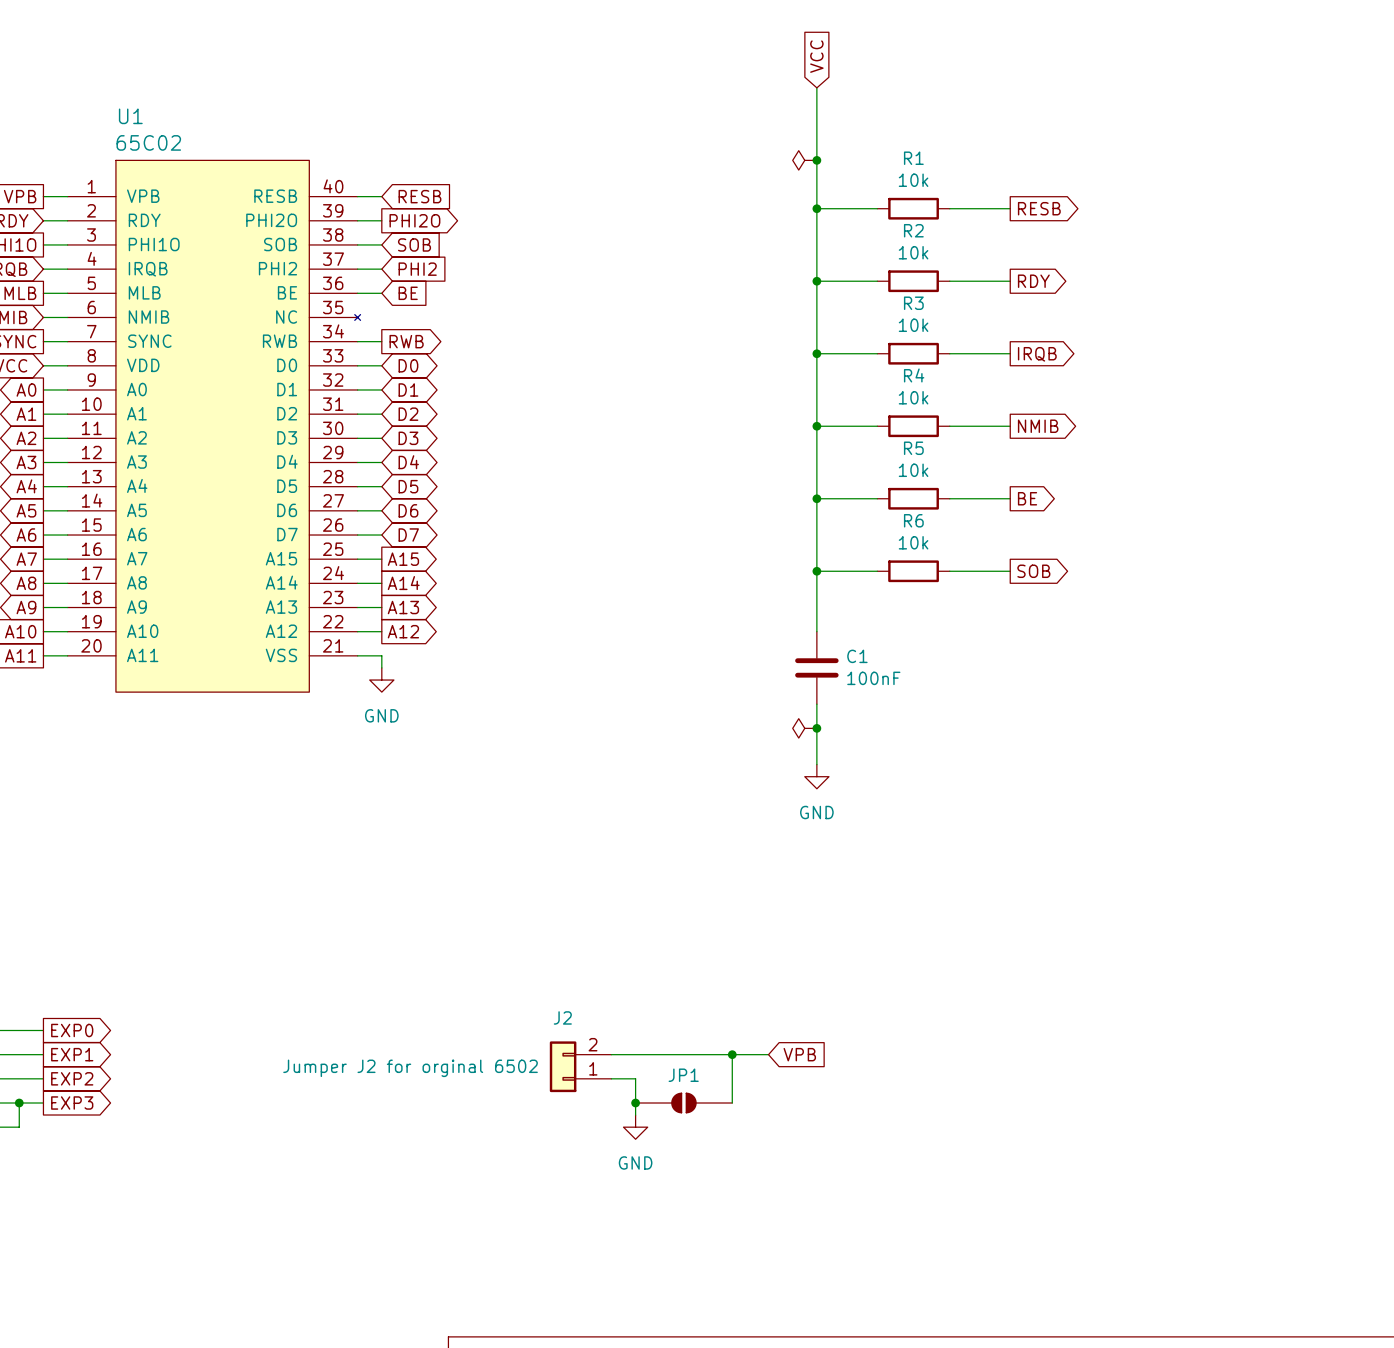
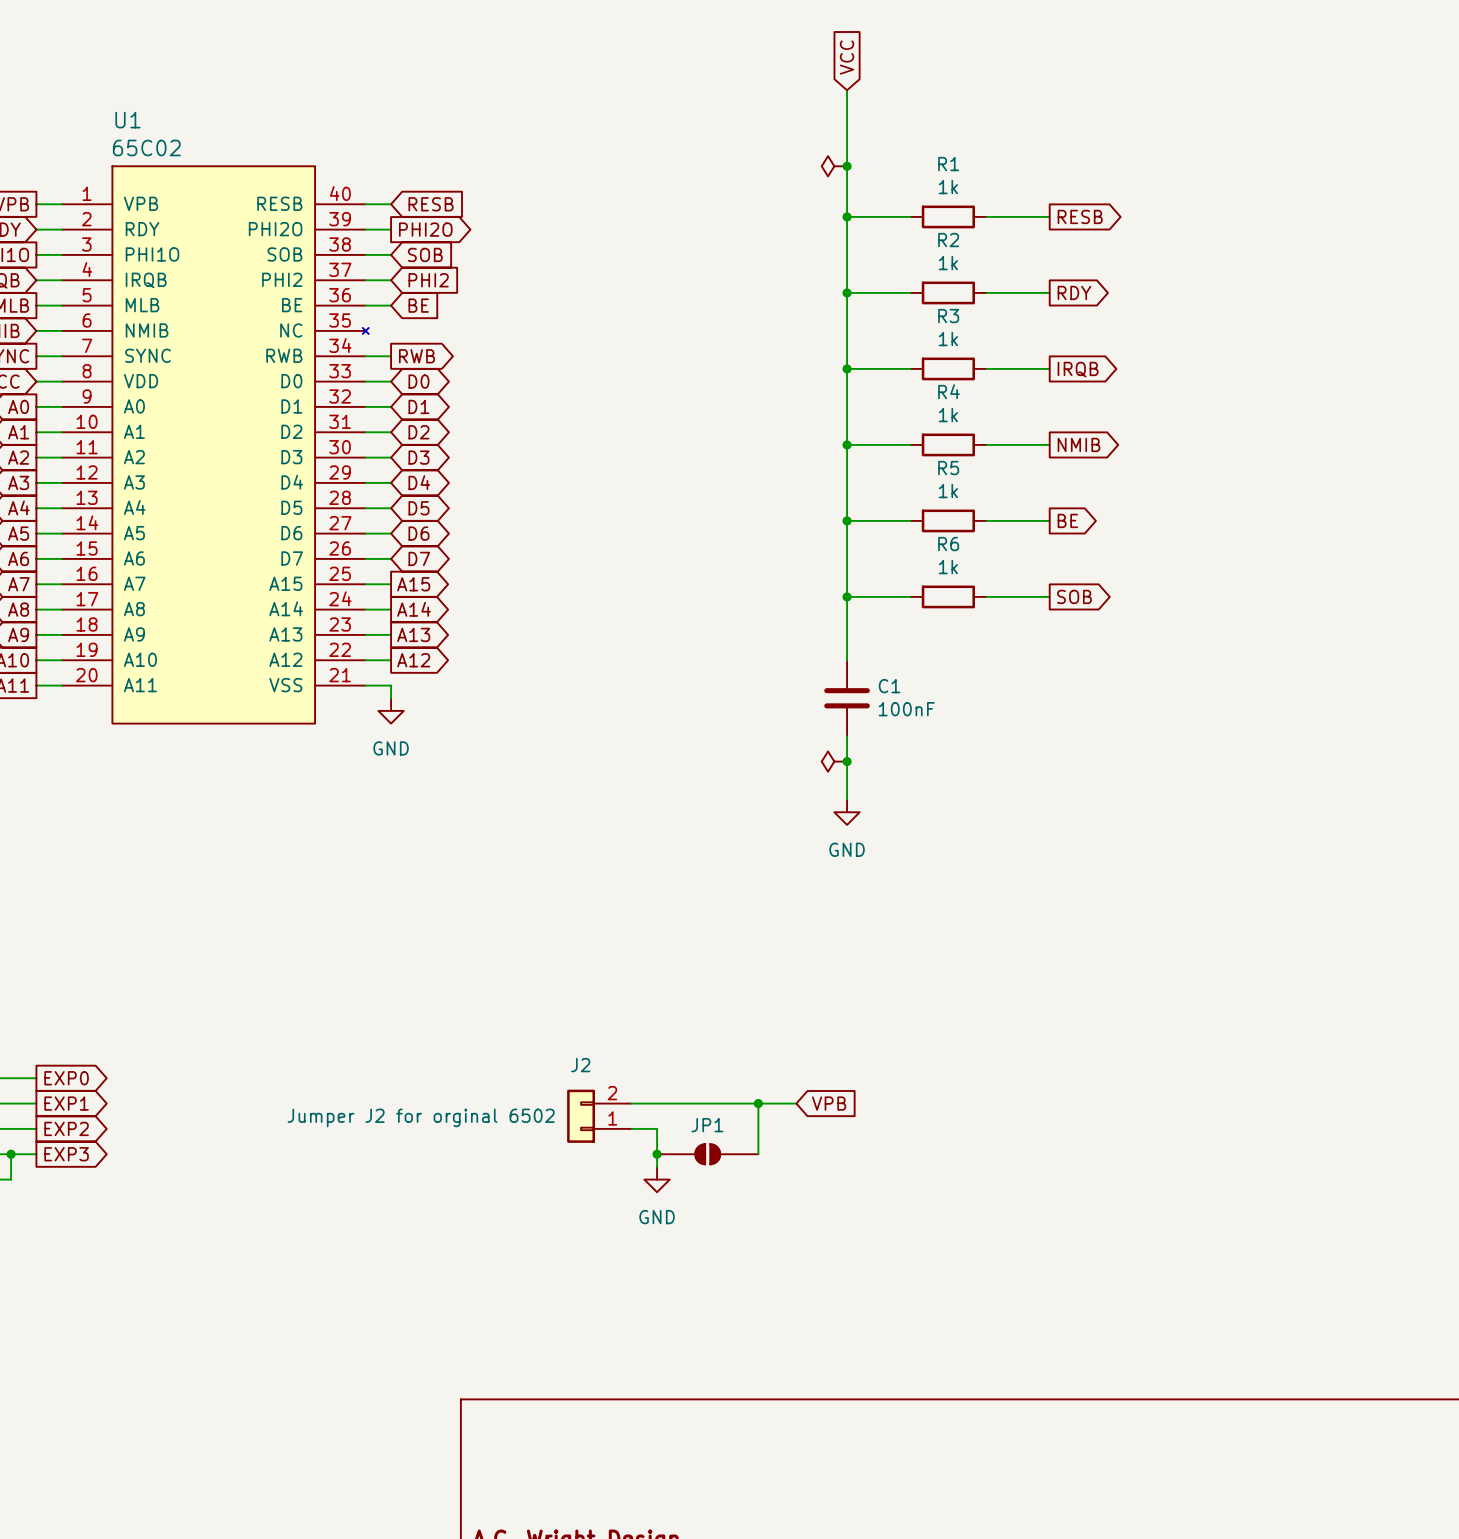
R1 value: 10k (913, 180) -> 1k (948, 187)
R2 value: 10k (913, 252) -> 1k (948, 263)
R3 value: 10k (913, 325) -> 1k (948, 339)
R4 value: 10k (913, 397) -> 1k (948, 415)
R5 value: 10k (913, 470) -> 1k (948, 491)
R6 value: 10k (913, 542) -> 1k (948, 567)

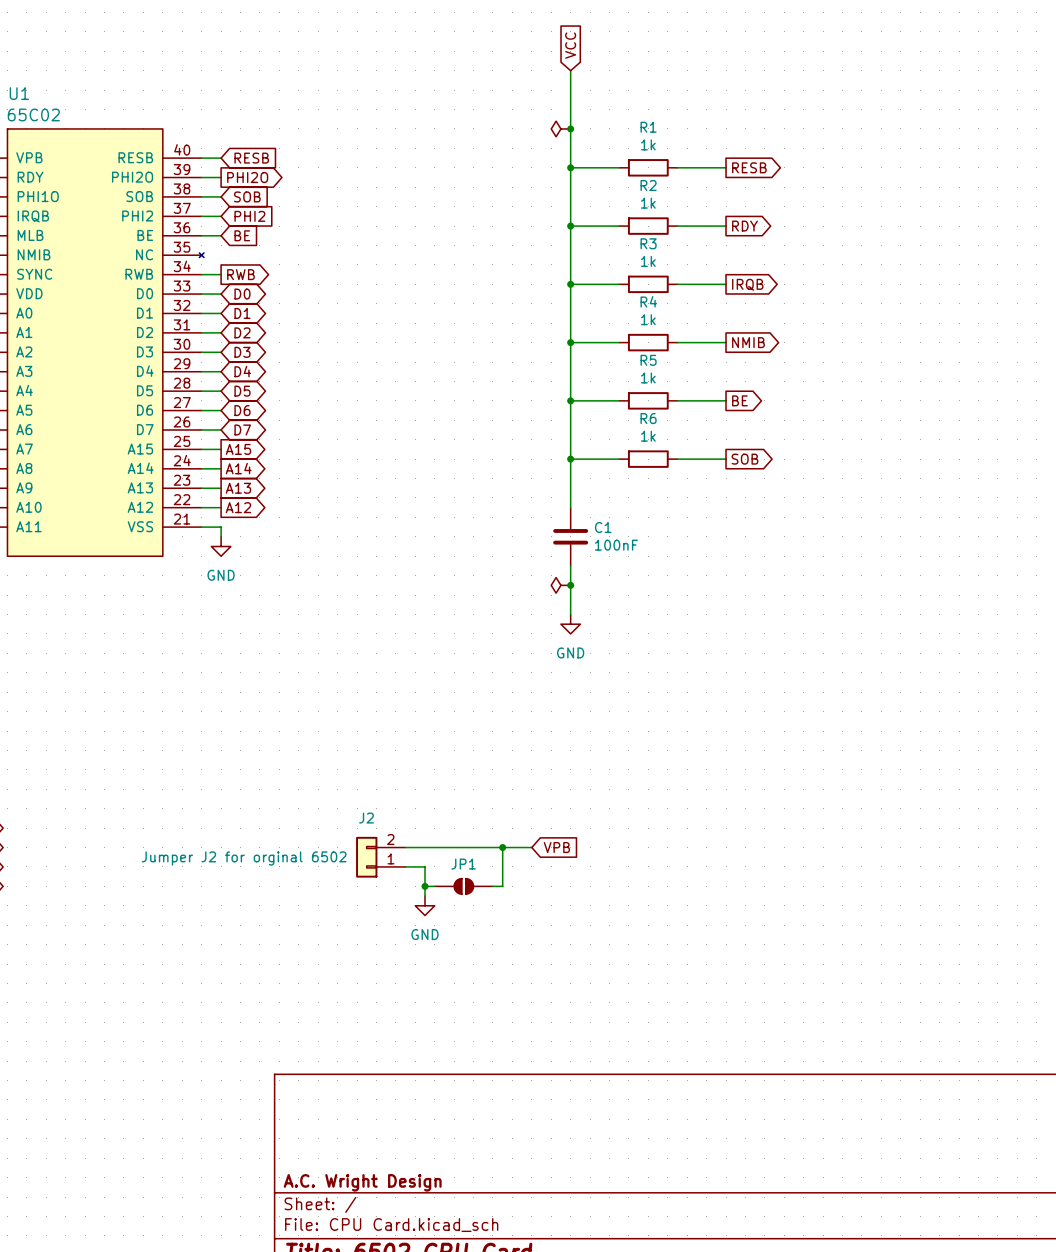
JP1 symbol: [657, 1143, 759, 1166] -> [434, 878, 493, 895]

